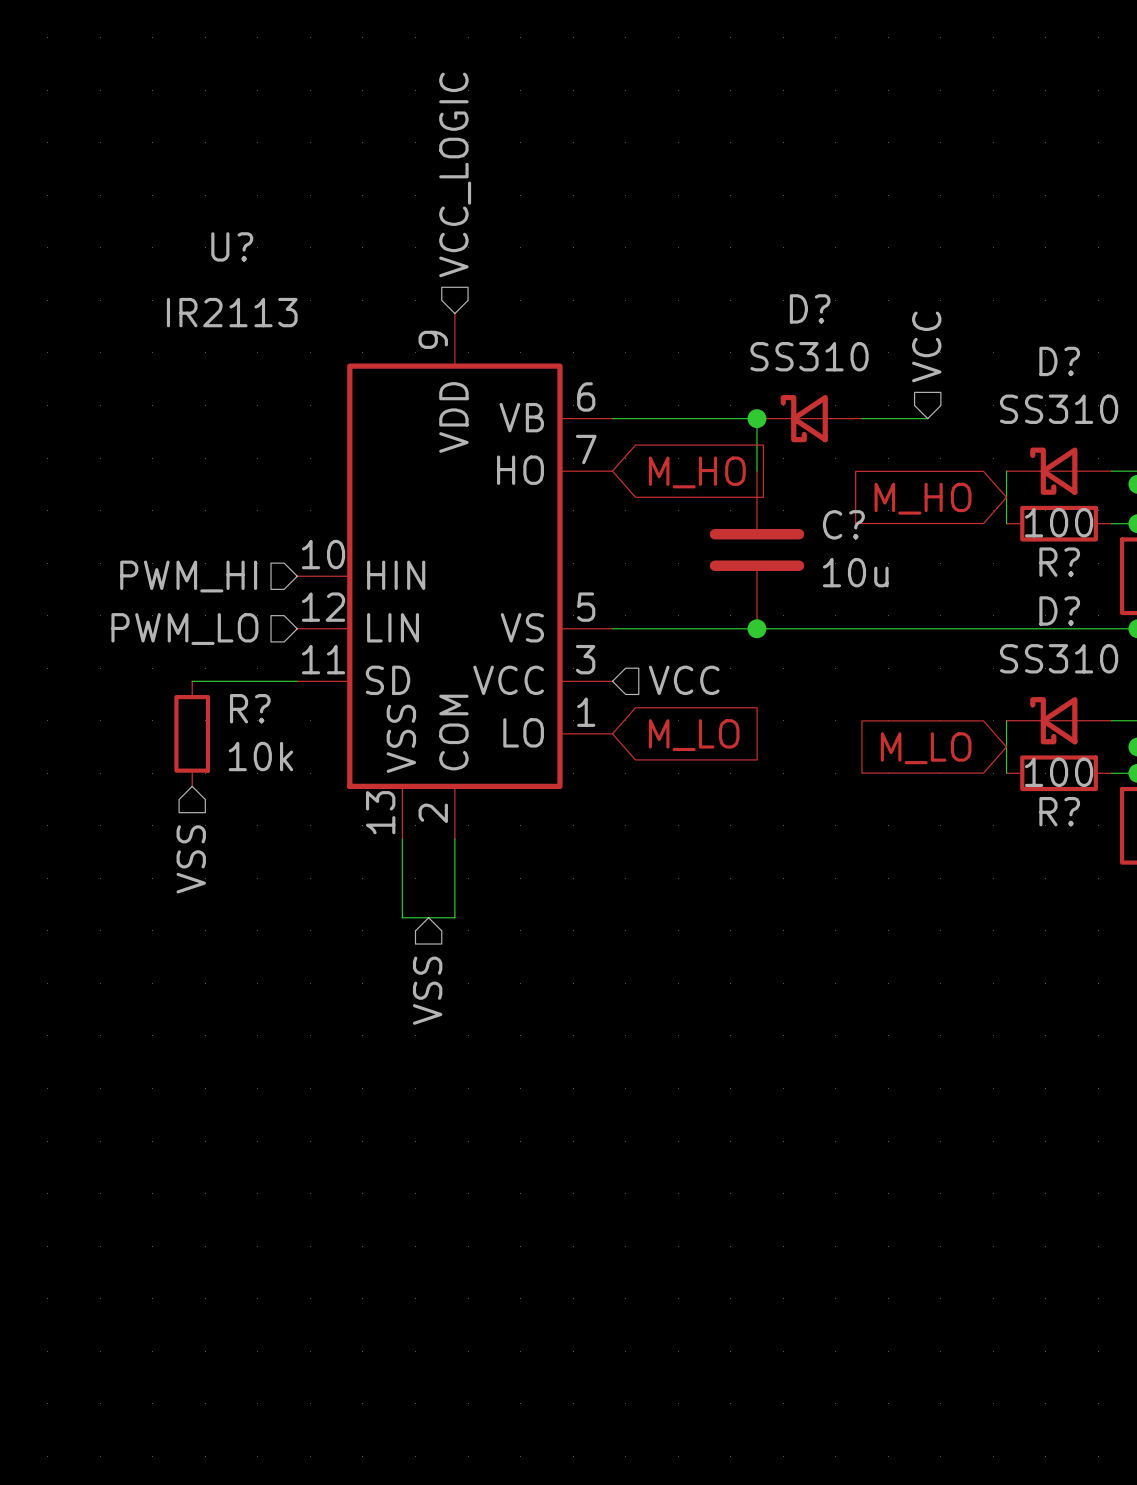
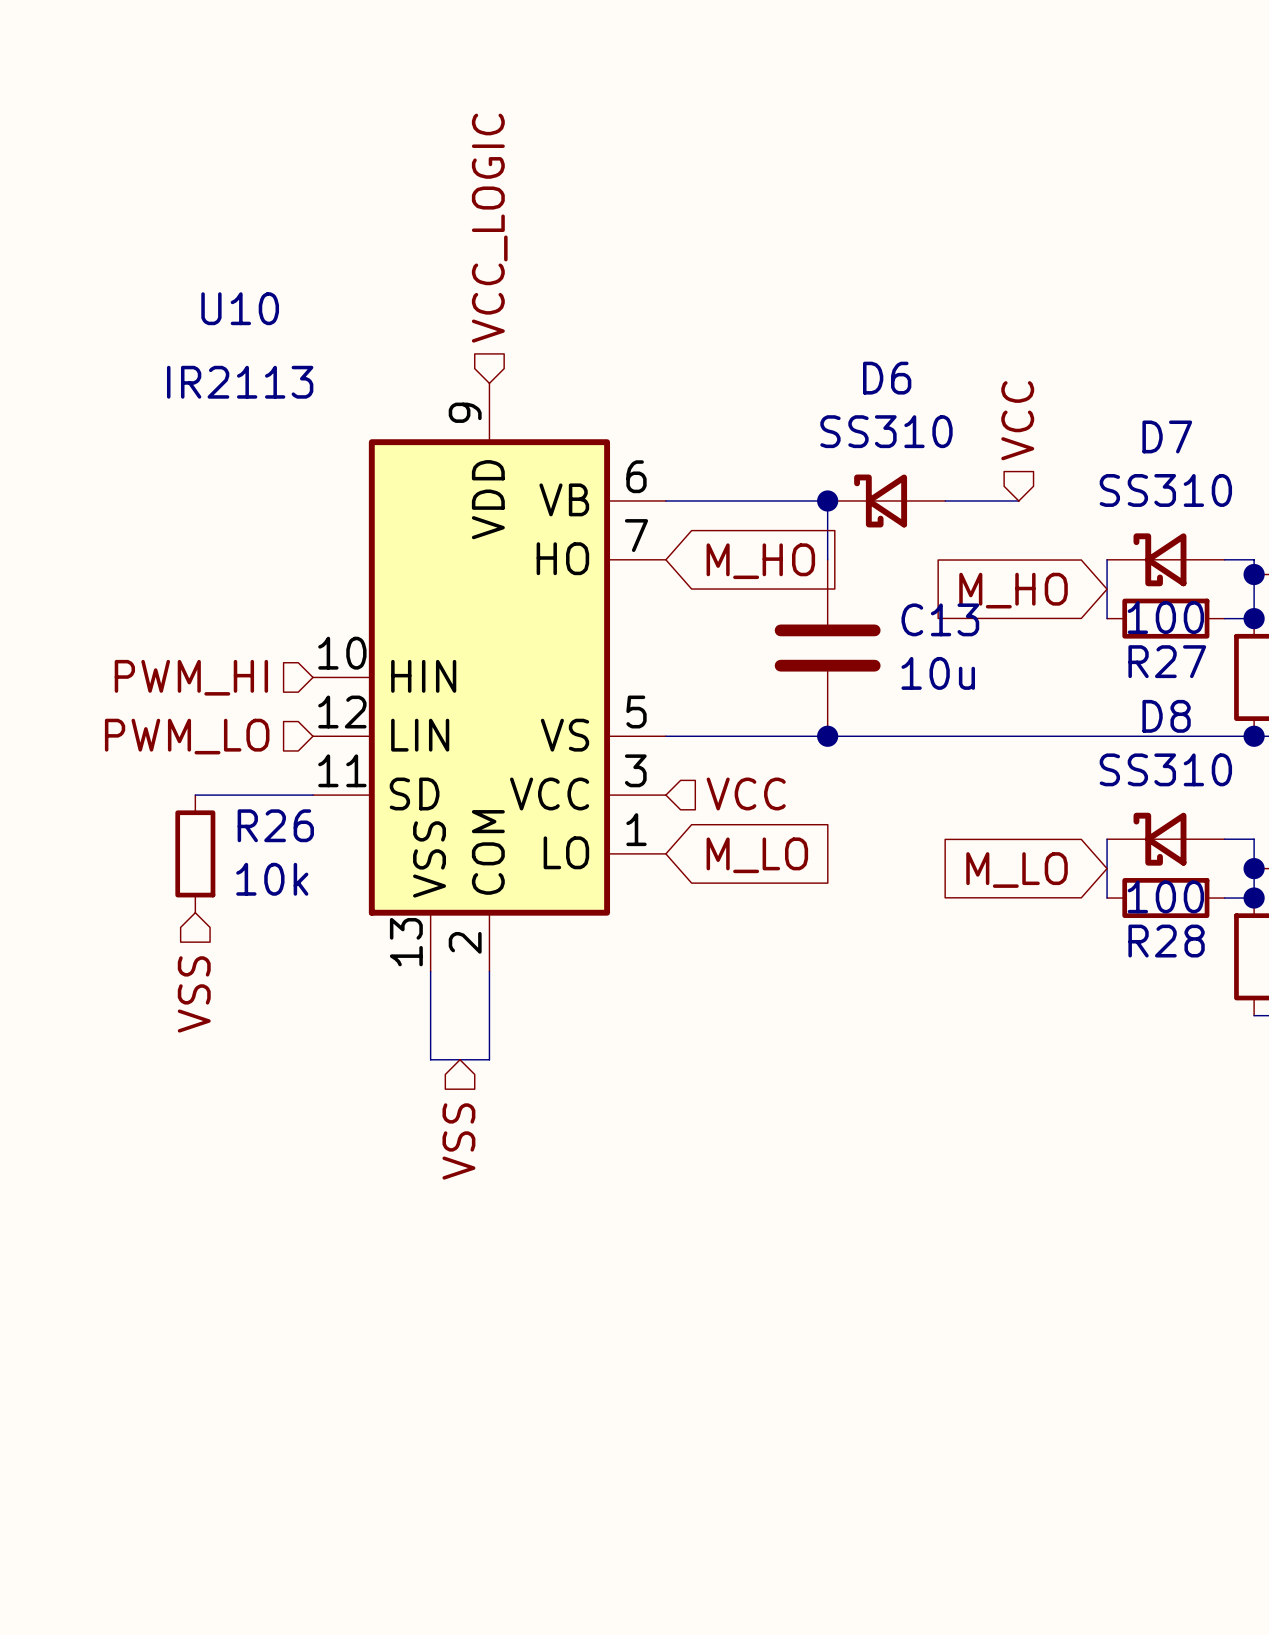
U? name: U? (232, 246) -> U10 (240, 308)
D? name: D? (810, 308) -> D6 (887, 378)
D? name: D? (1059, 361) -> D7 (1167, 436)
C? name: C? (843, 524) -> C13 (940, 619)
R? name: R? (1059, 562) -> R27 (1167, 661)
D? name: D? (1059, 610) -> D8 (1166, 716)
R? name: R? (250, 708) -> R26 (275, 825)
R? name: R? (1059, 811) -> R28 (1166, 941)

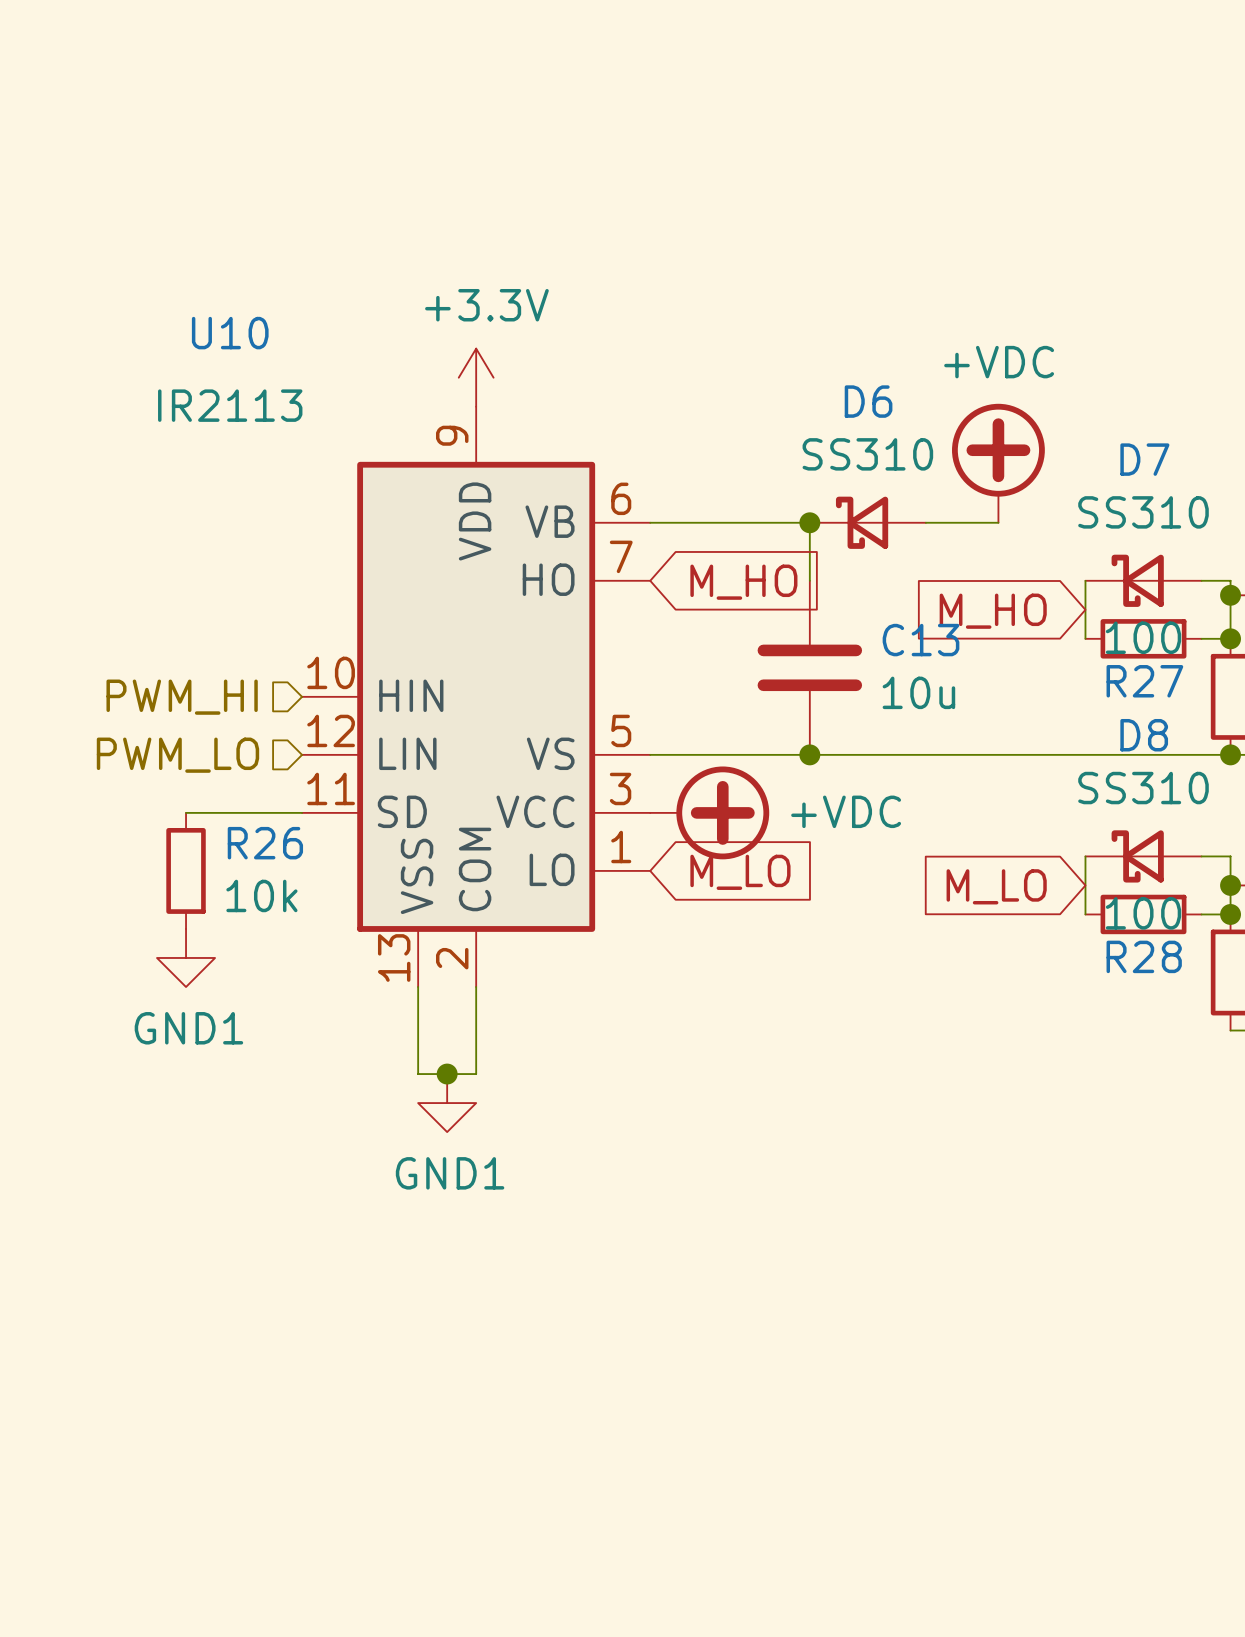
hierarchical label: VCC_LOGIC (489, 228) -> none
power symbol: none -> +3.3V (476, 377)
hierarchical label: VCC (1017, 420) -> none
power symbol: none -> +VDC (998, 463)
hierarchical label: VCC (746, 793) -> none
power symbol: none -> +VDC (709, 812)
power symbol: none -> GND1 (186, 957)
hierarchical label: VSS (194, 994) -> none
junction: none -> (447, 1074)
power symbol: none -> GND1 (447, 1103)
hierarchical label: VSS (458, 1141) -> none

